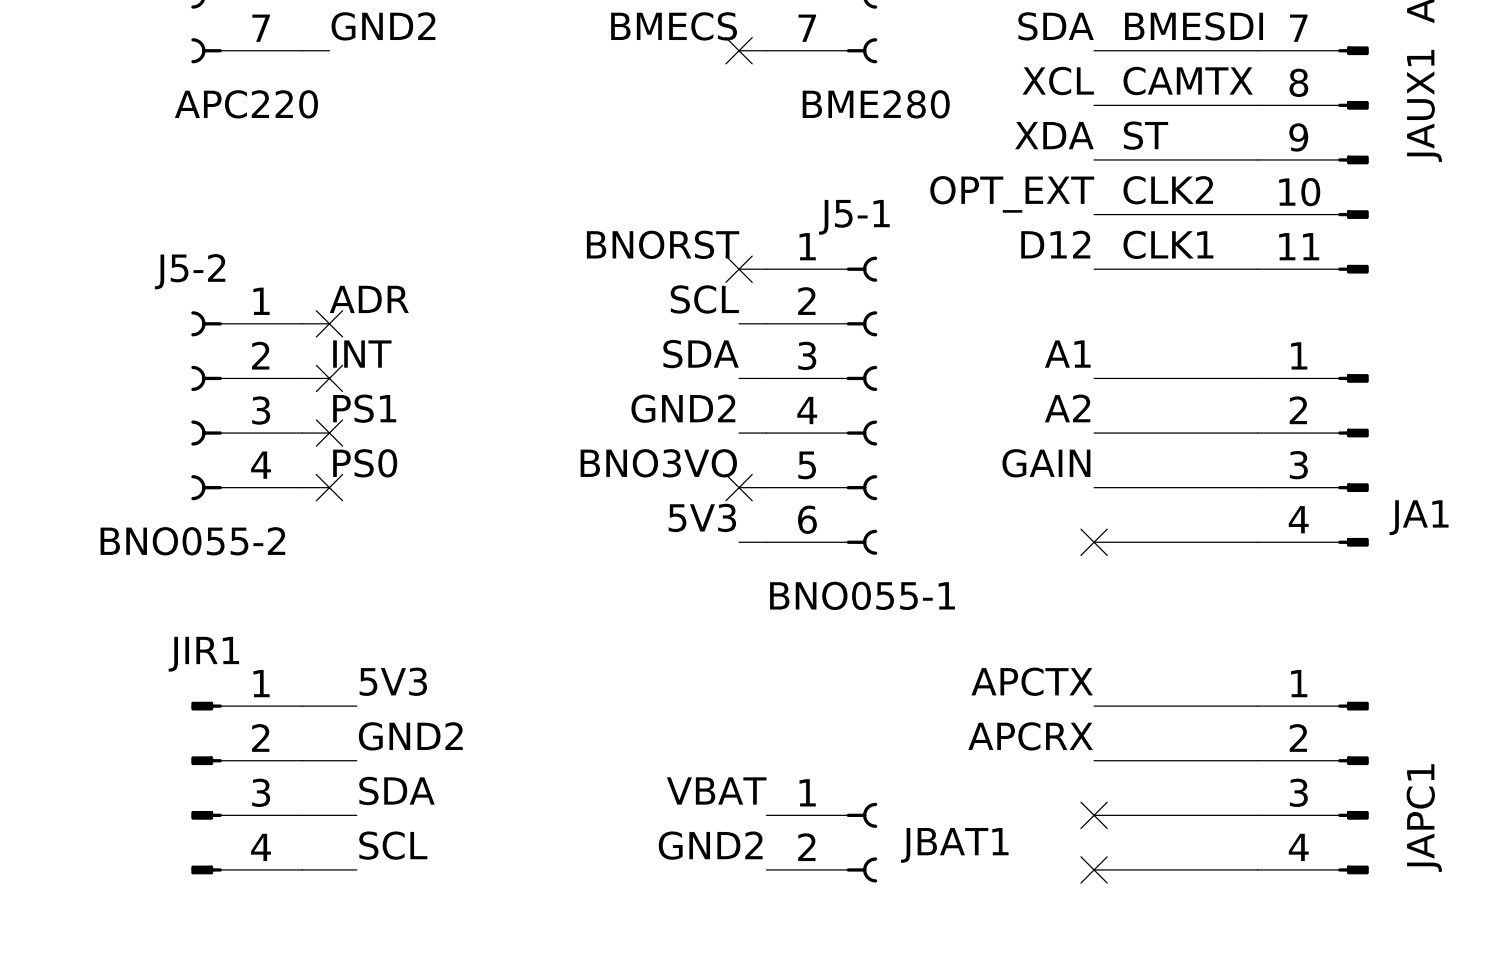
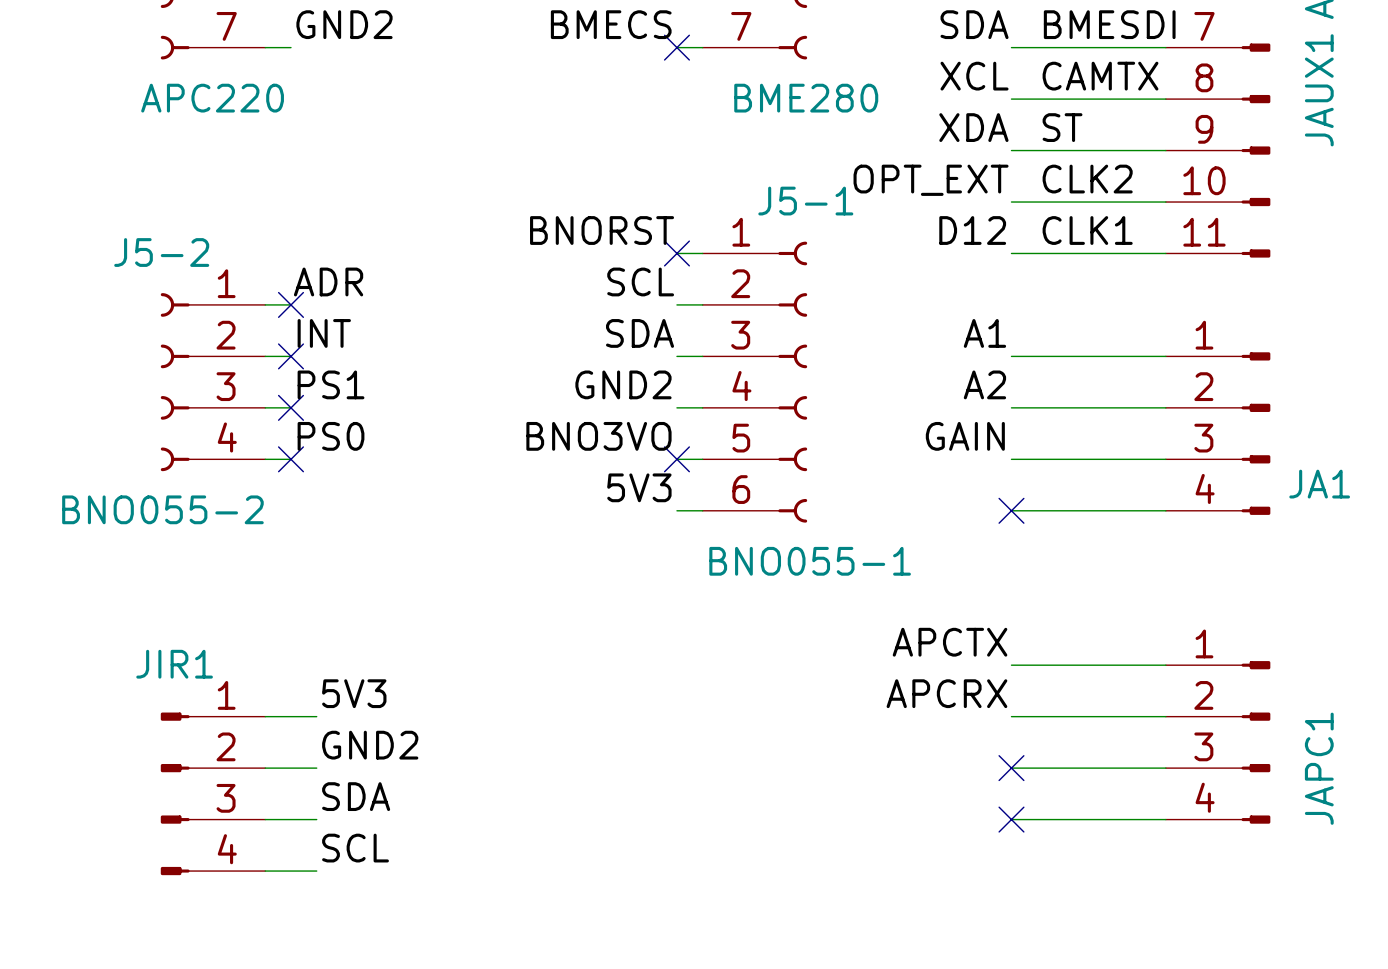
label: 5V3 (393, 681) -> none
wire: (302, 706) (356, 706) -> (265, 871) (316, 871)
label: GND2 (410, 736) -> 5V3 (354, 693)
JIR1 position: (246, 788) -> (213, 793)
label: SDA (396, 790) -> GND2 (370, 745)
label: VBAT (716, 790) -> none
JBAT1: (821, 842) -> none
label: SCL (393, 845) -> SDA (356, 796)
label: GND2 (710, 845) -> none
label: none -> SCL (355, 848)

